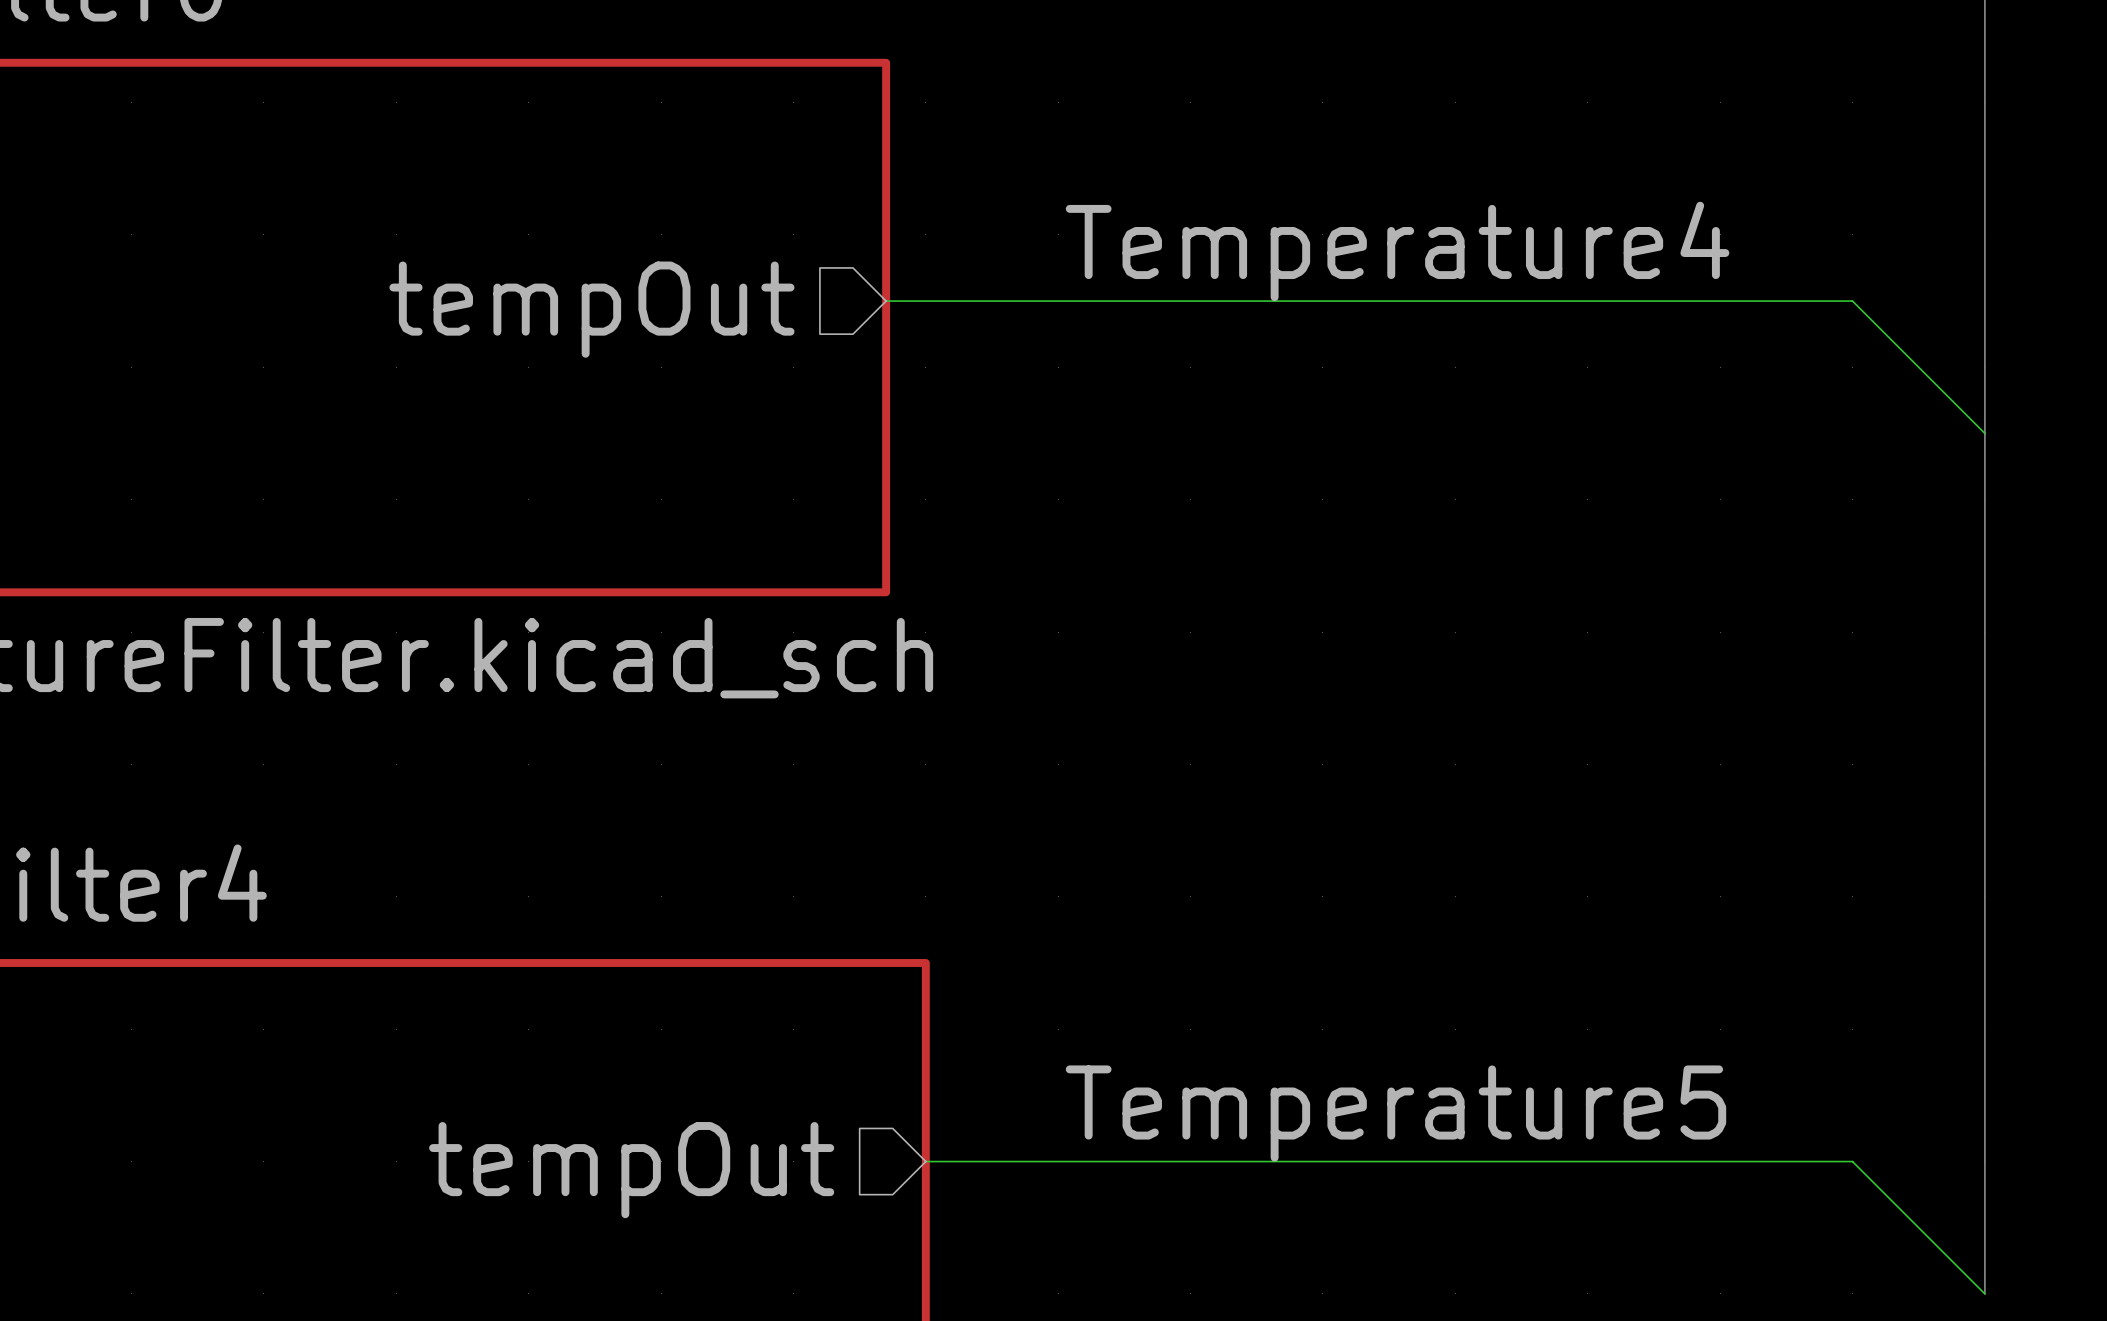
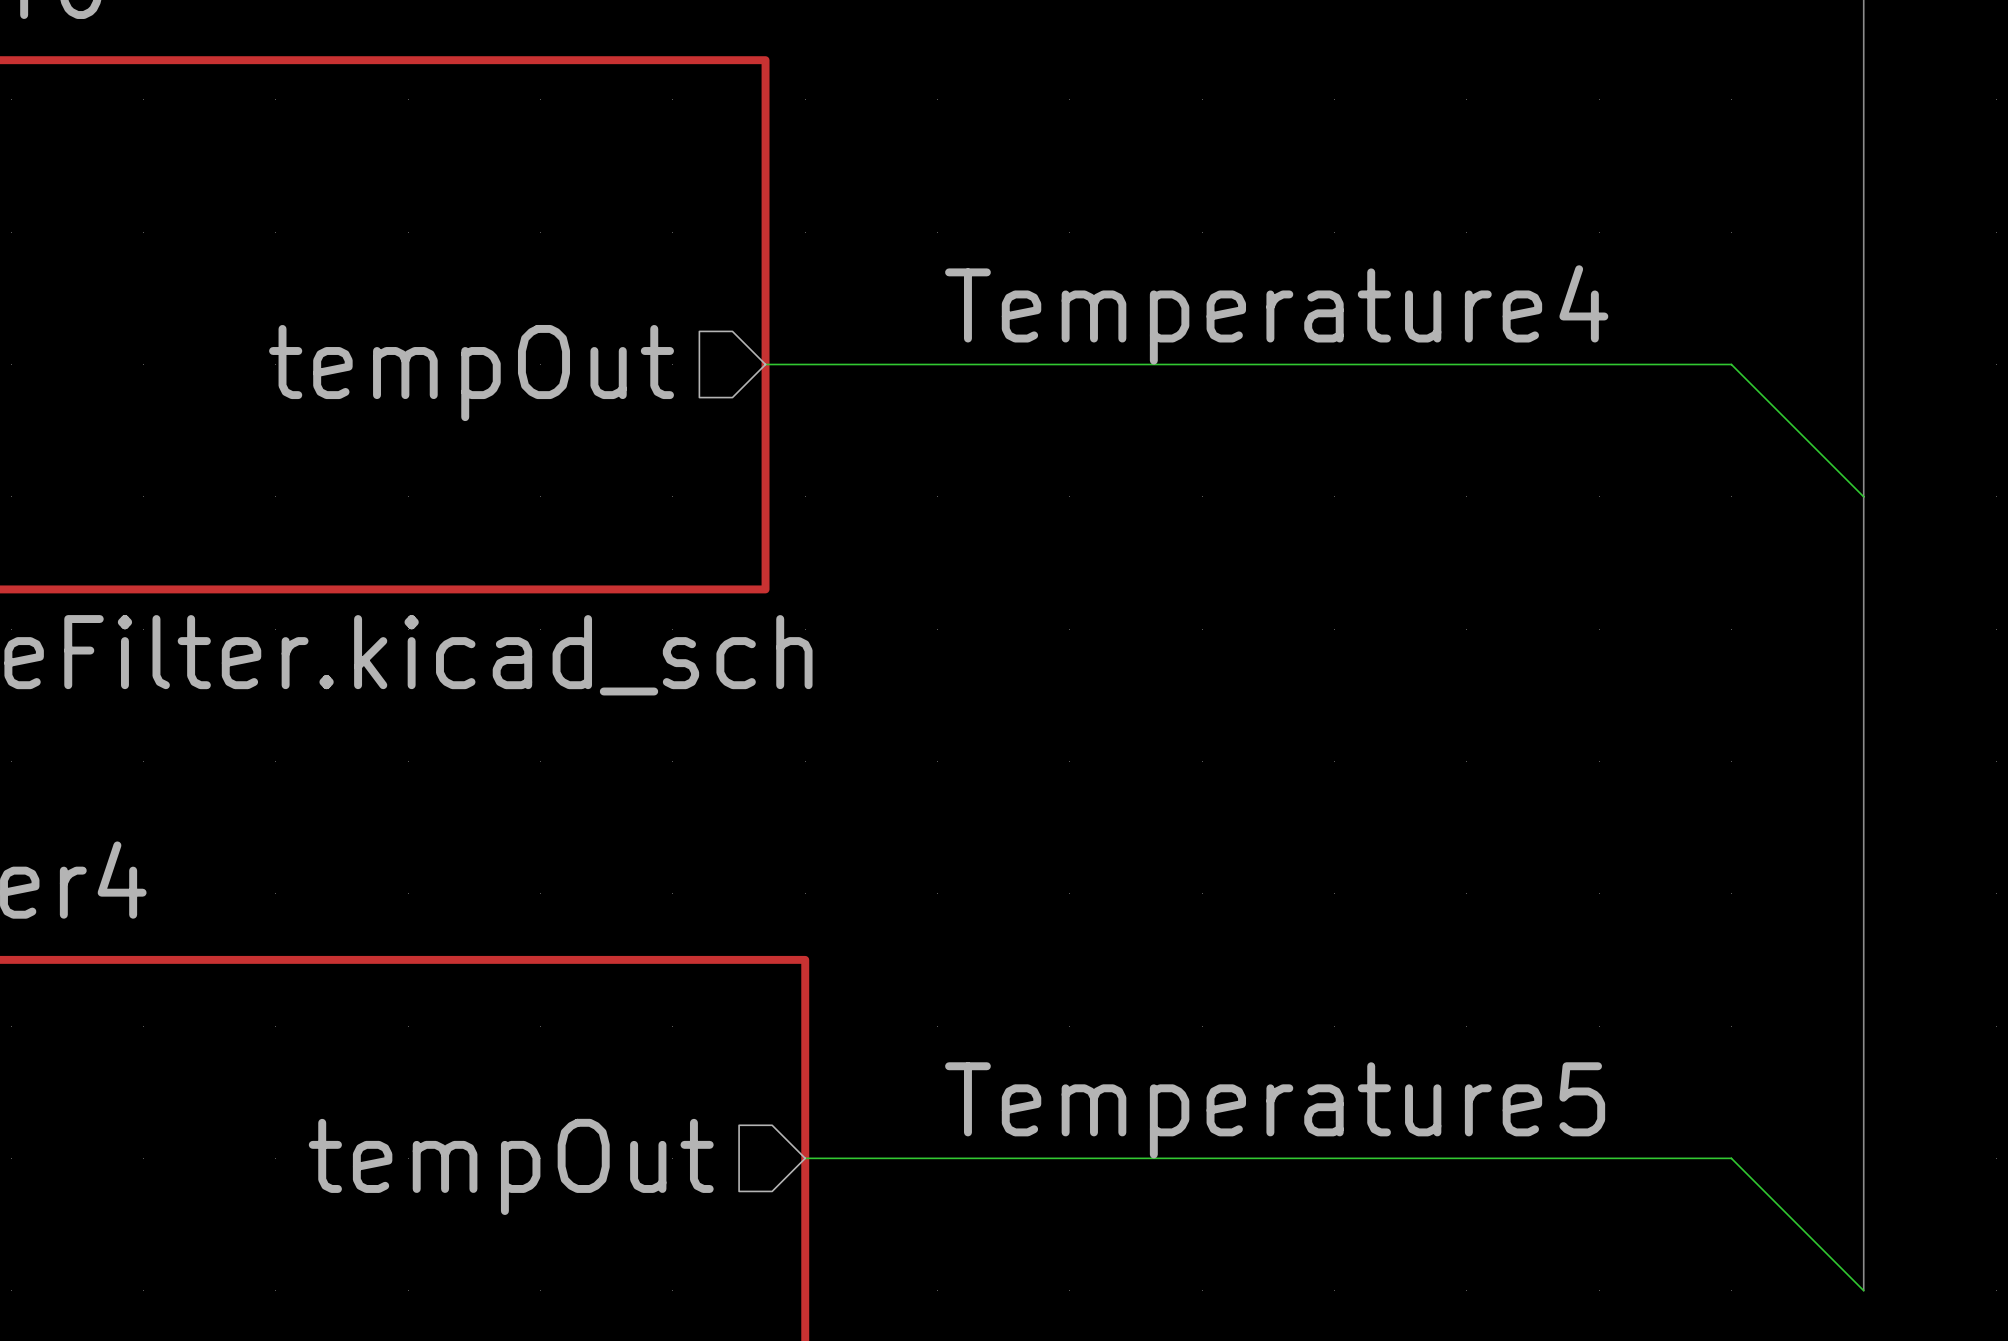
label position: Temperature4 (1397, 251) -> Temperature4 (1276, 314)
wire: (886, 301) (1852, 301) (1984, 433) -> (765, 364) (1731, 364) (1863, 496)
sheet pin position: tempOut (591, 309) -> tempOut (471, 373)

